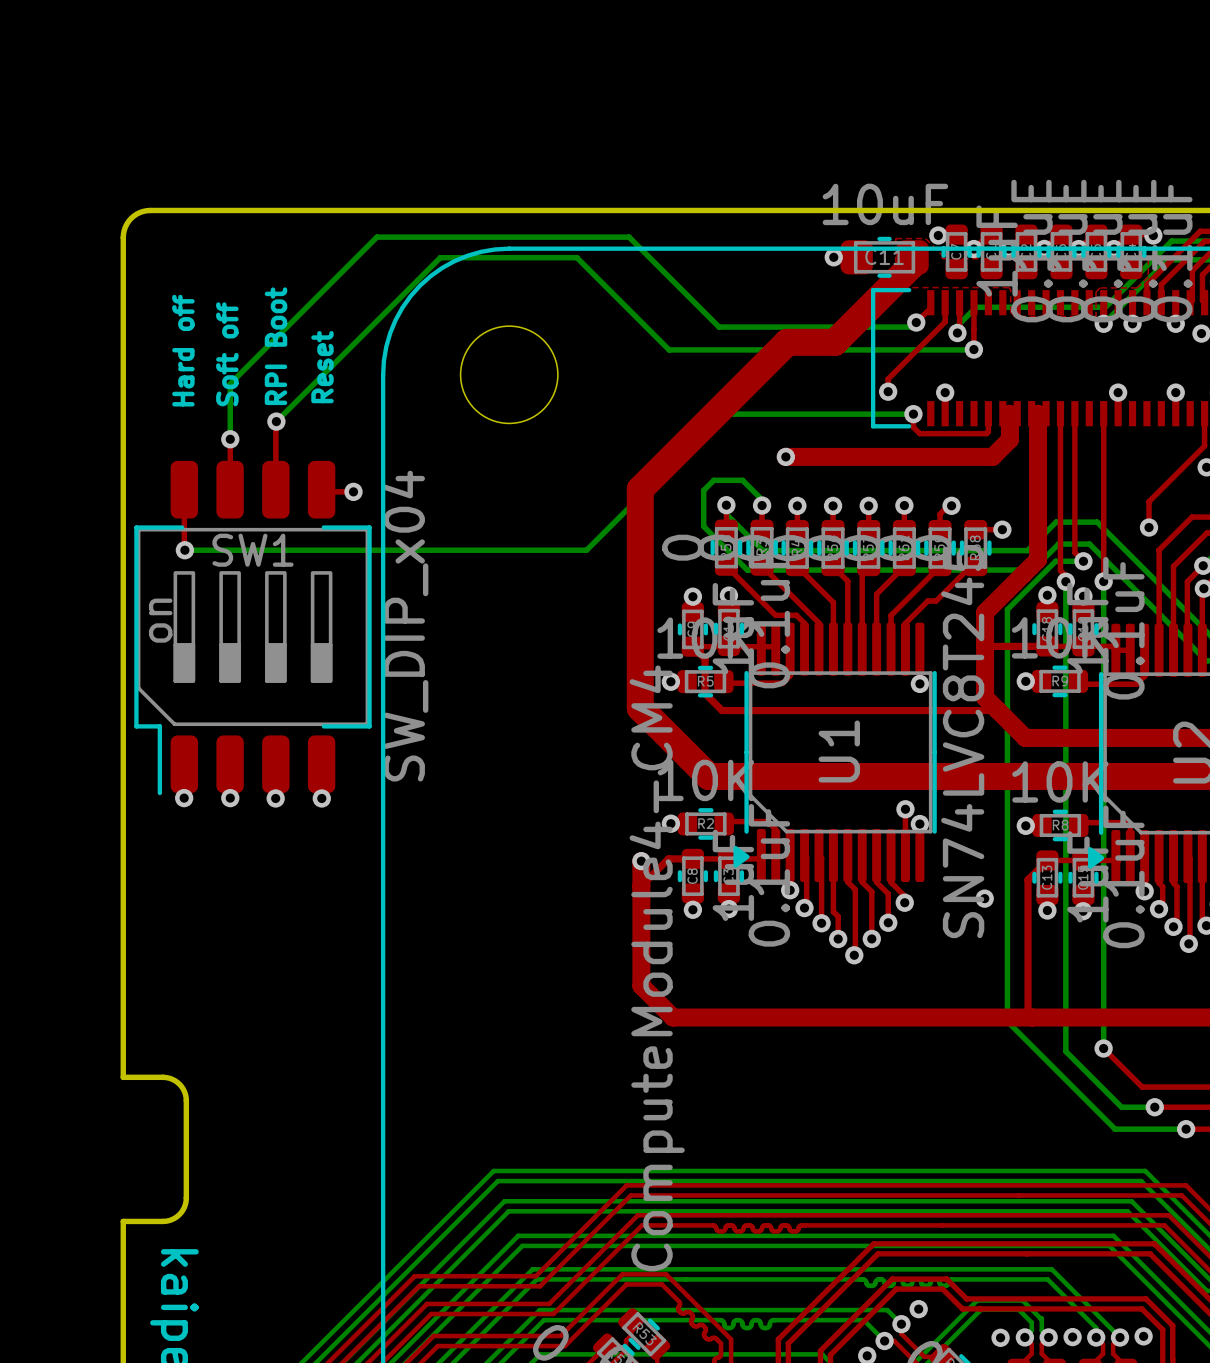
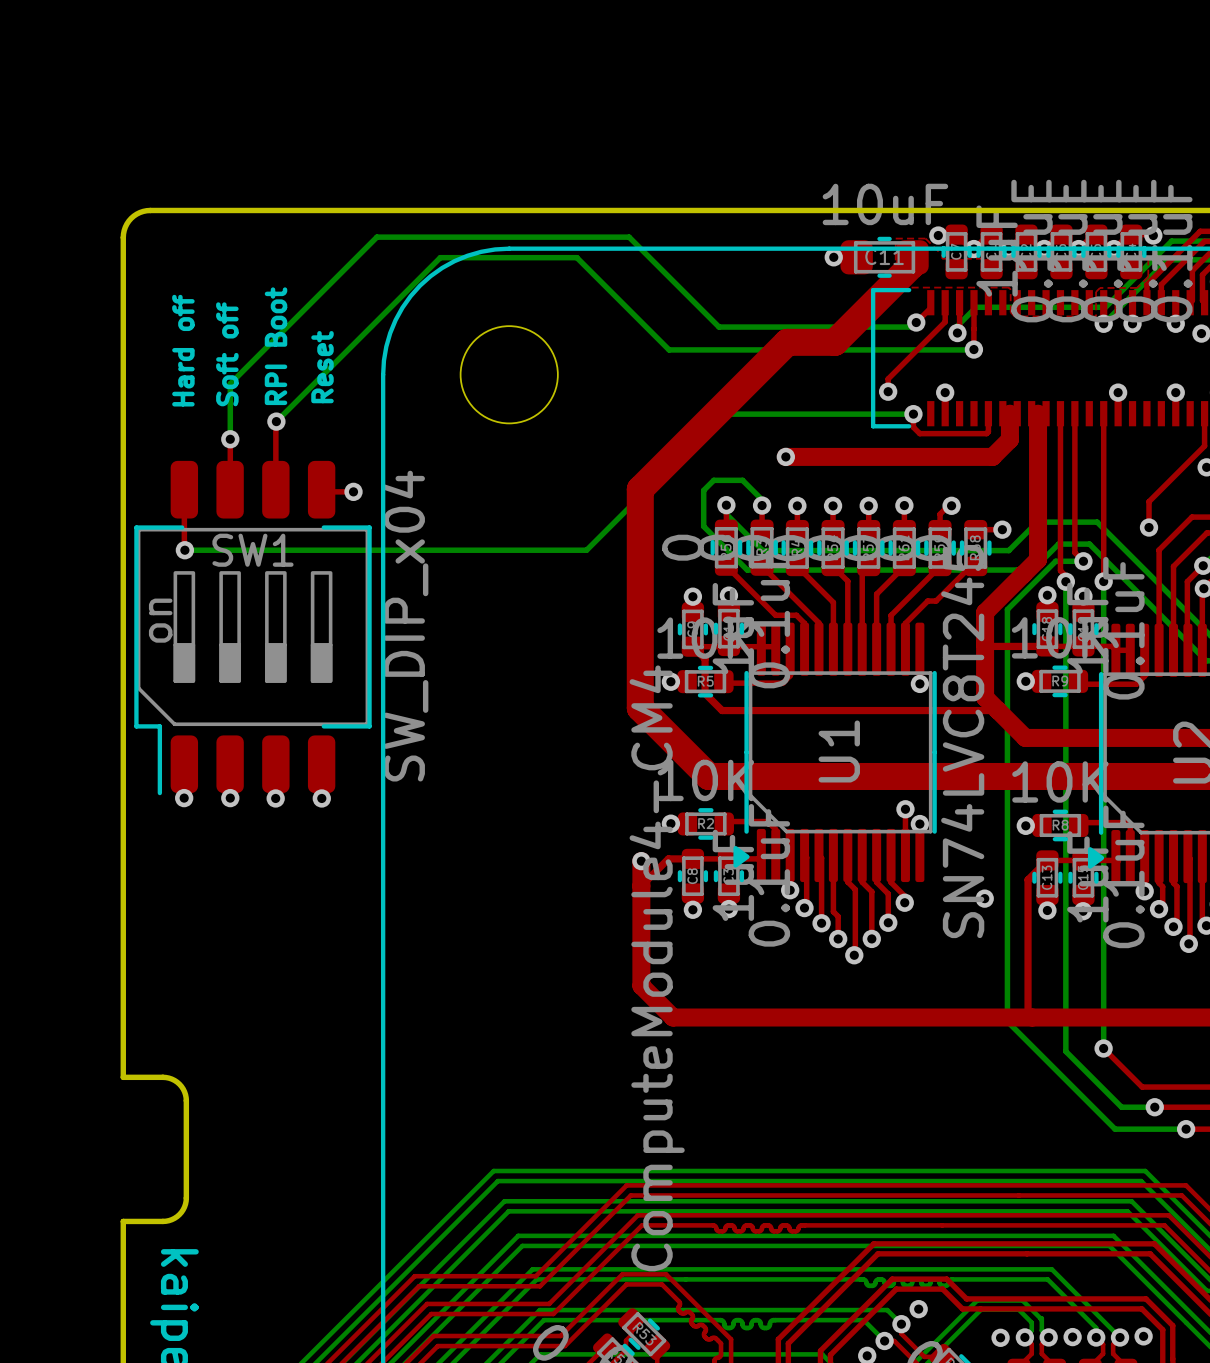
bottom track: (1056, 522) (1027, 550) (1008, 550) -> (1056, 522) (1037, 522) (1008, 550)

